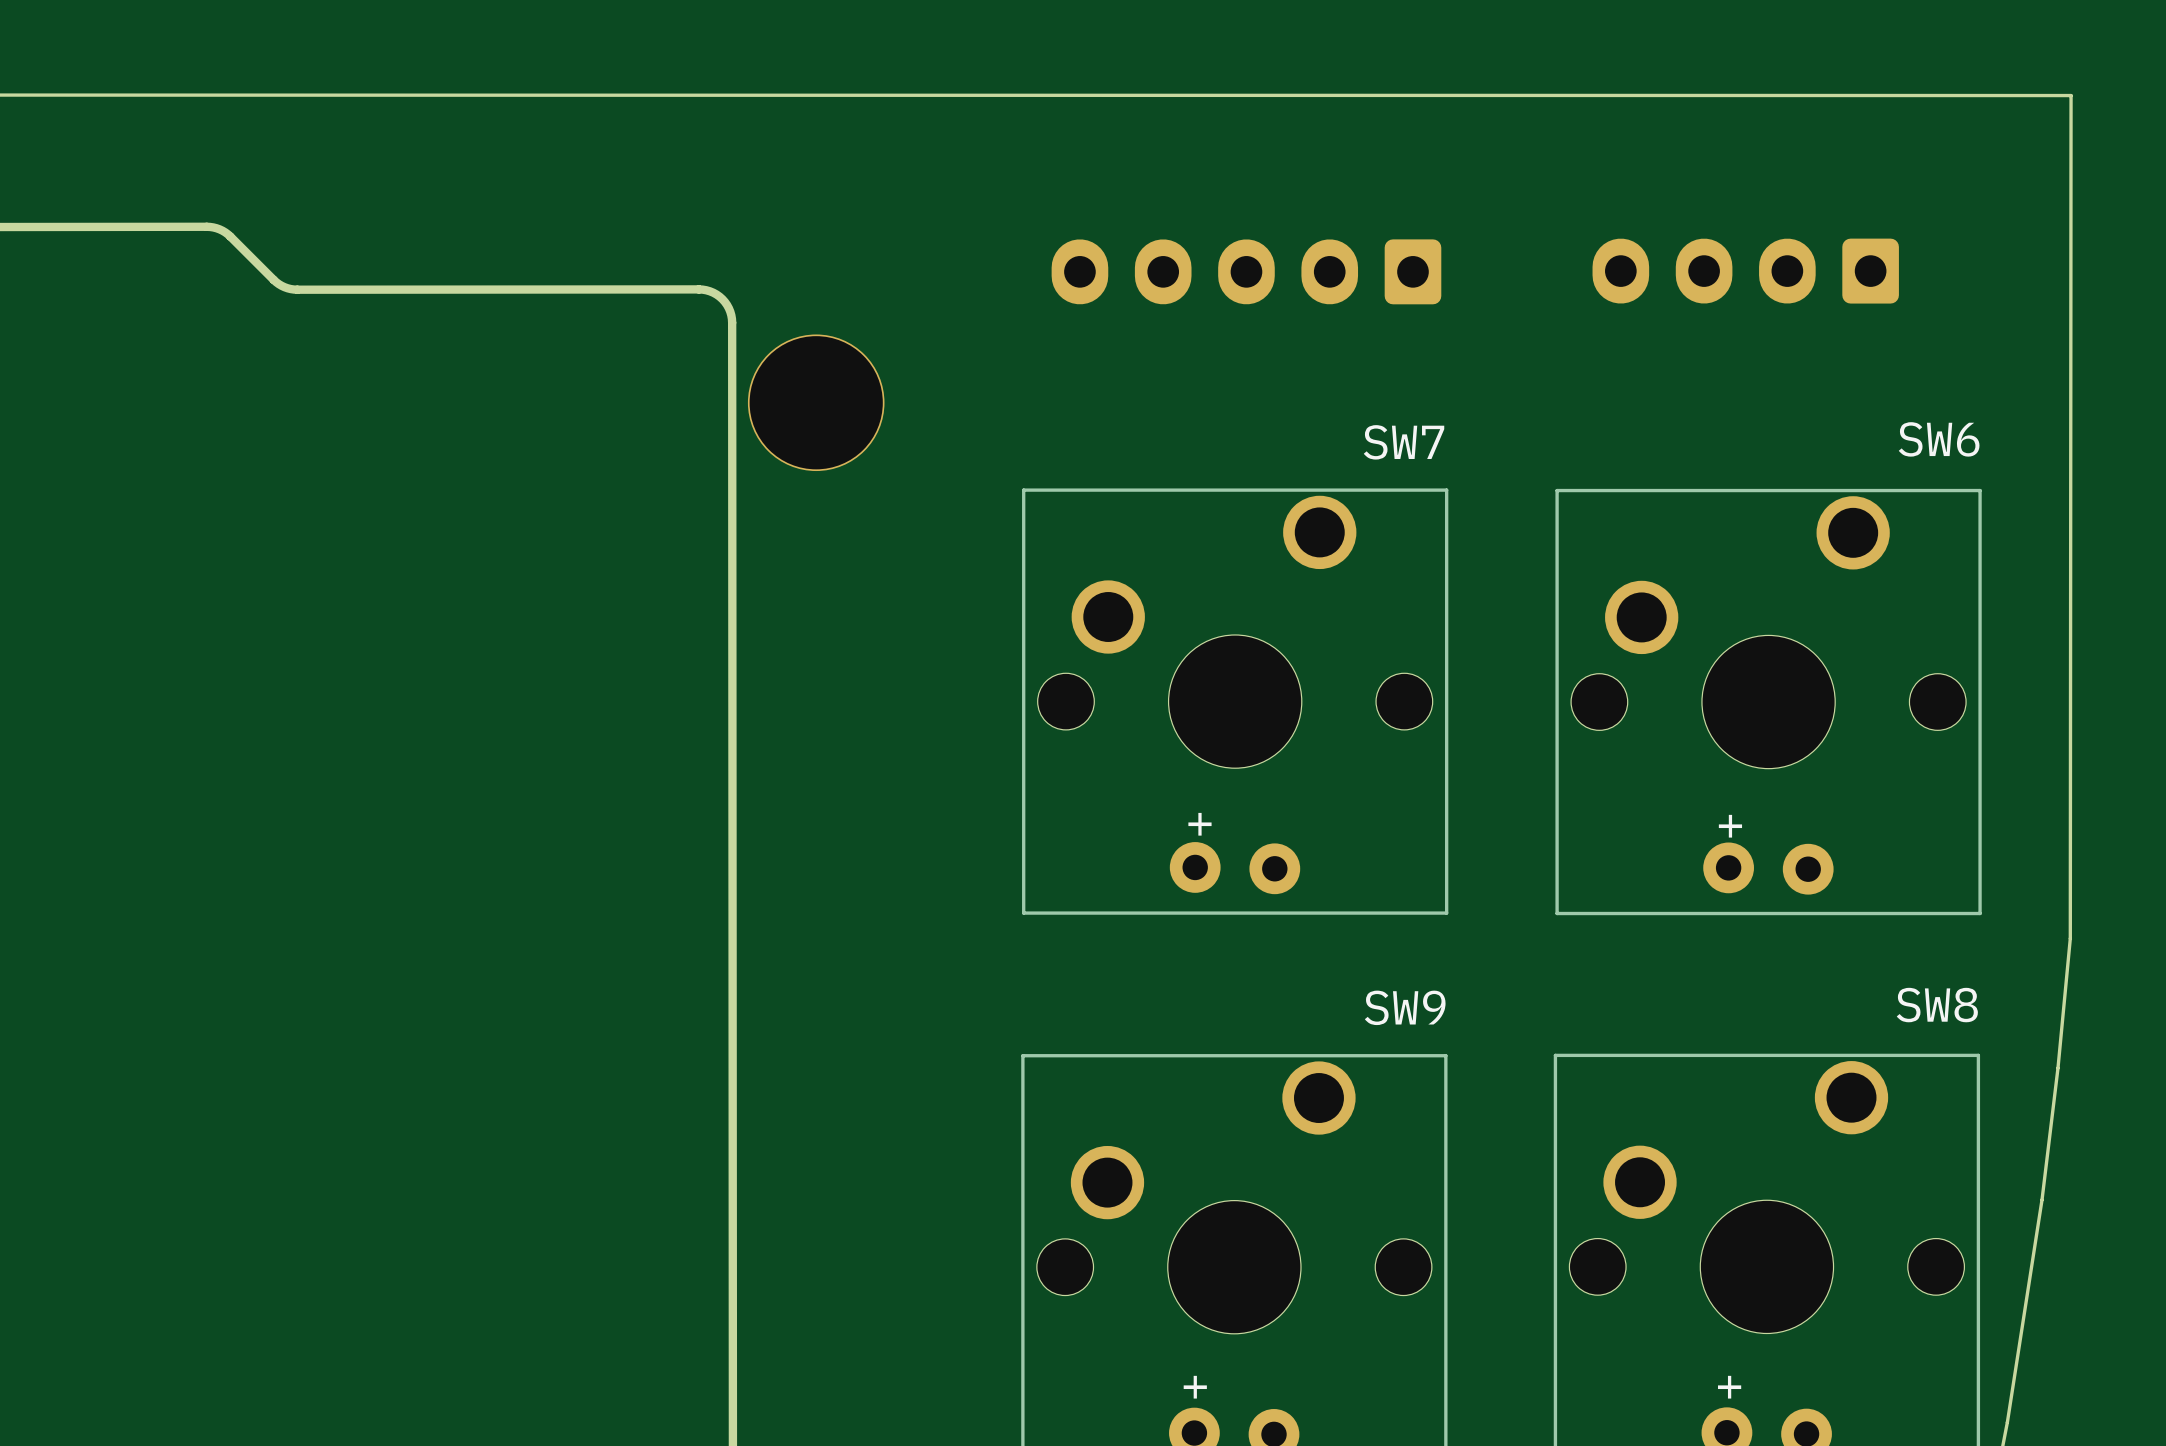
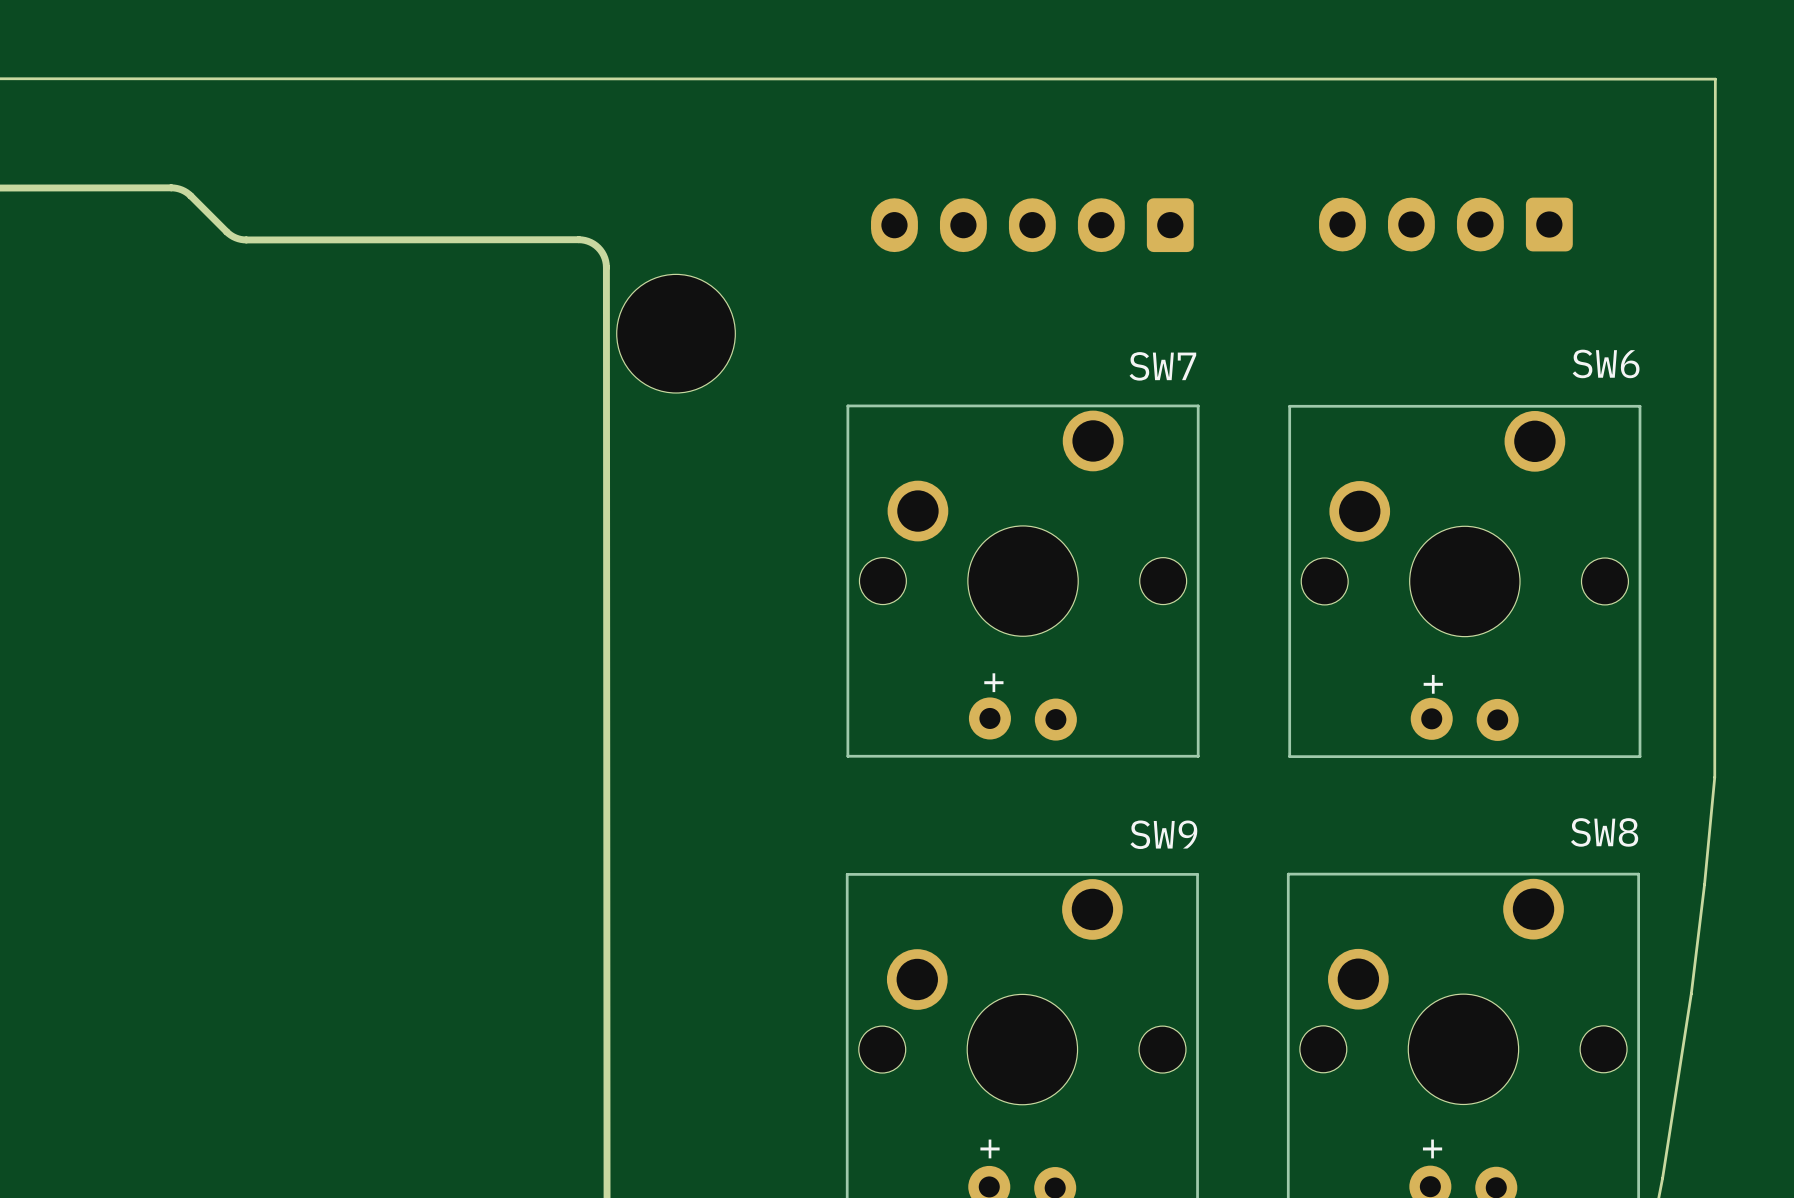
part footprint: [747, 334, 885, 472] -> [616, 274, 736, 394]

